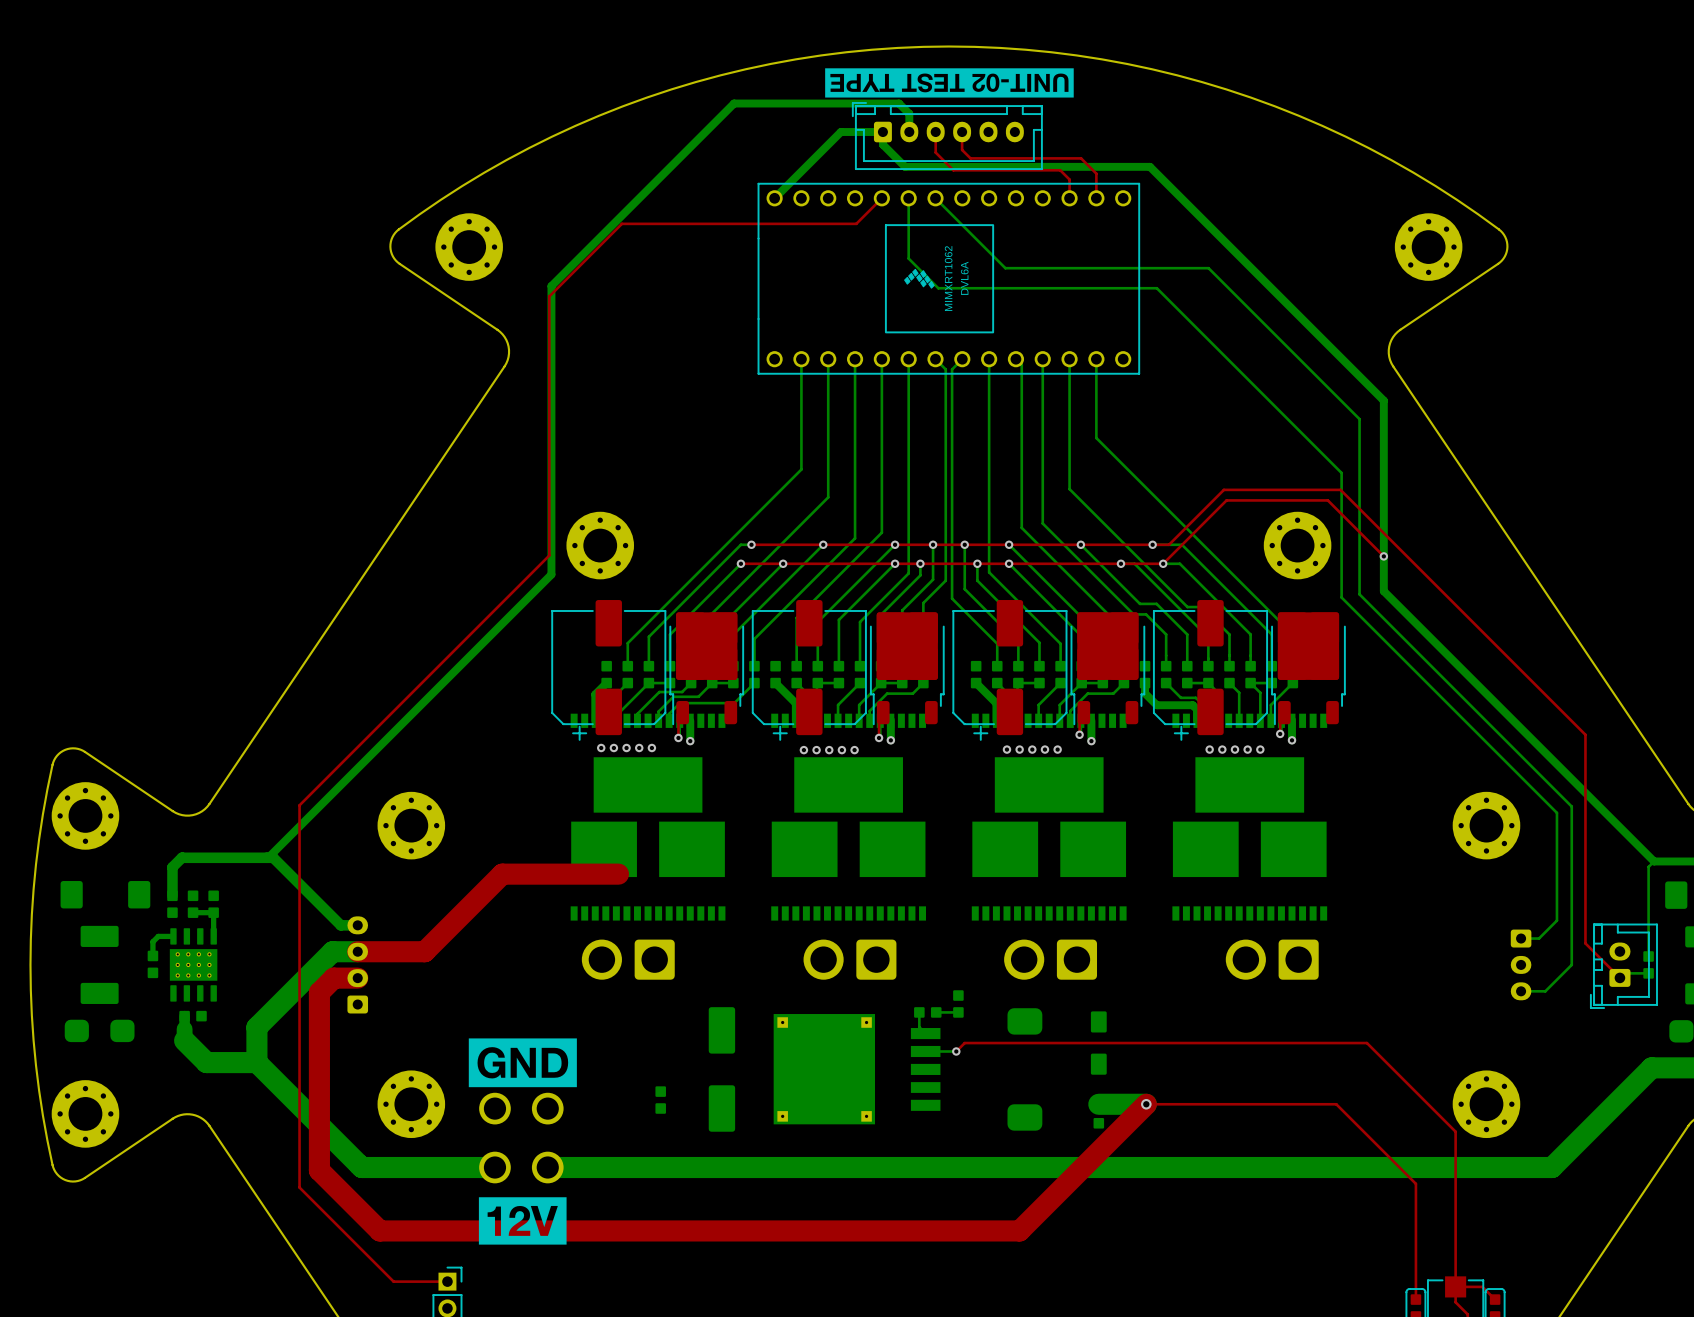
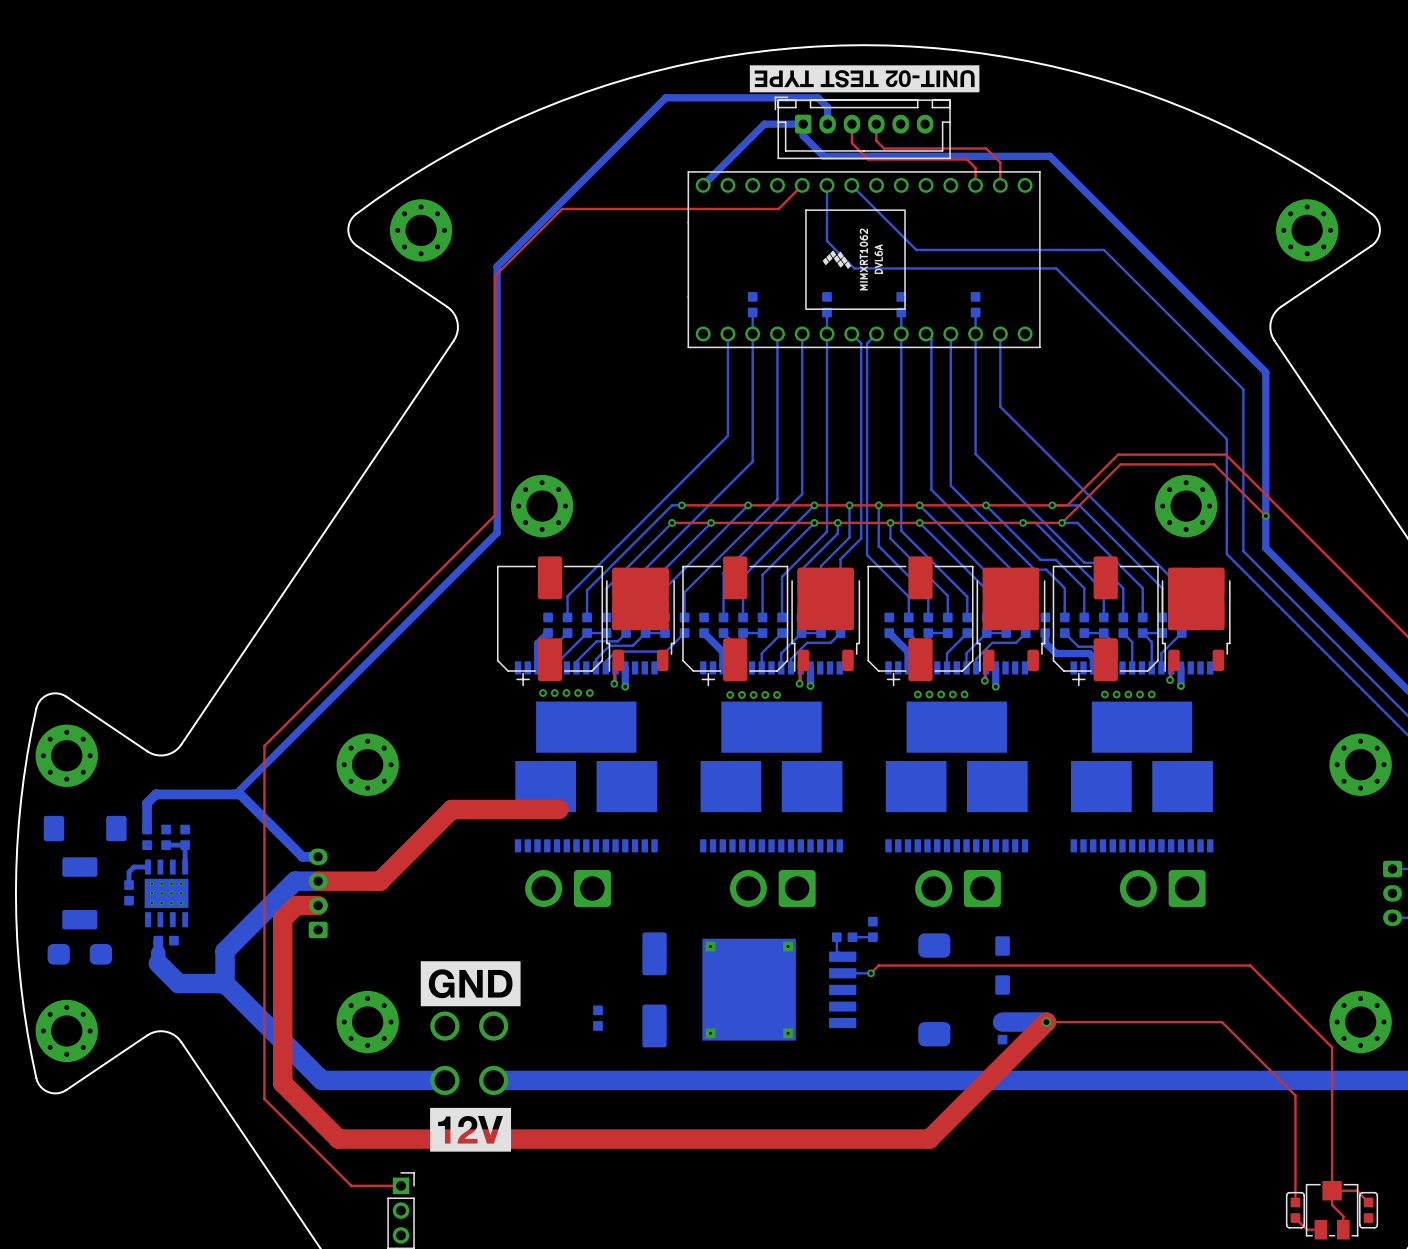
part: none -> (752, 304)
part: none -> (826, 304)
part: none -> (901, 304)
part: none -> (975, 304)
bottom track: none -> (752, 312) (752, 333)
bottom track: none -> (826, 312) (826, 333)
bottom track: none -> (901, 312) (901, 333)
bottom track: none -> (975, 312) (975, 333)

